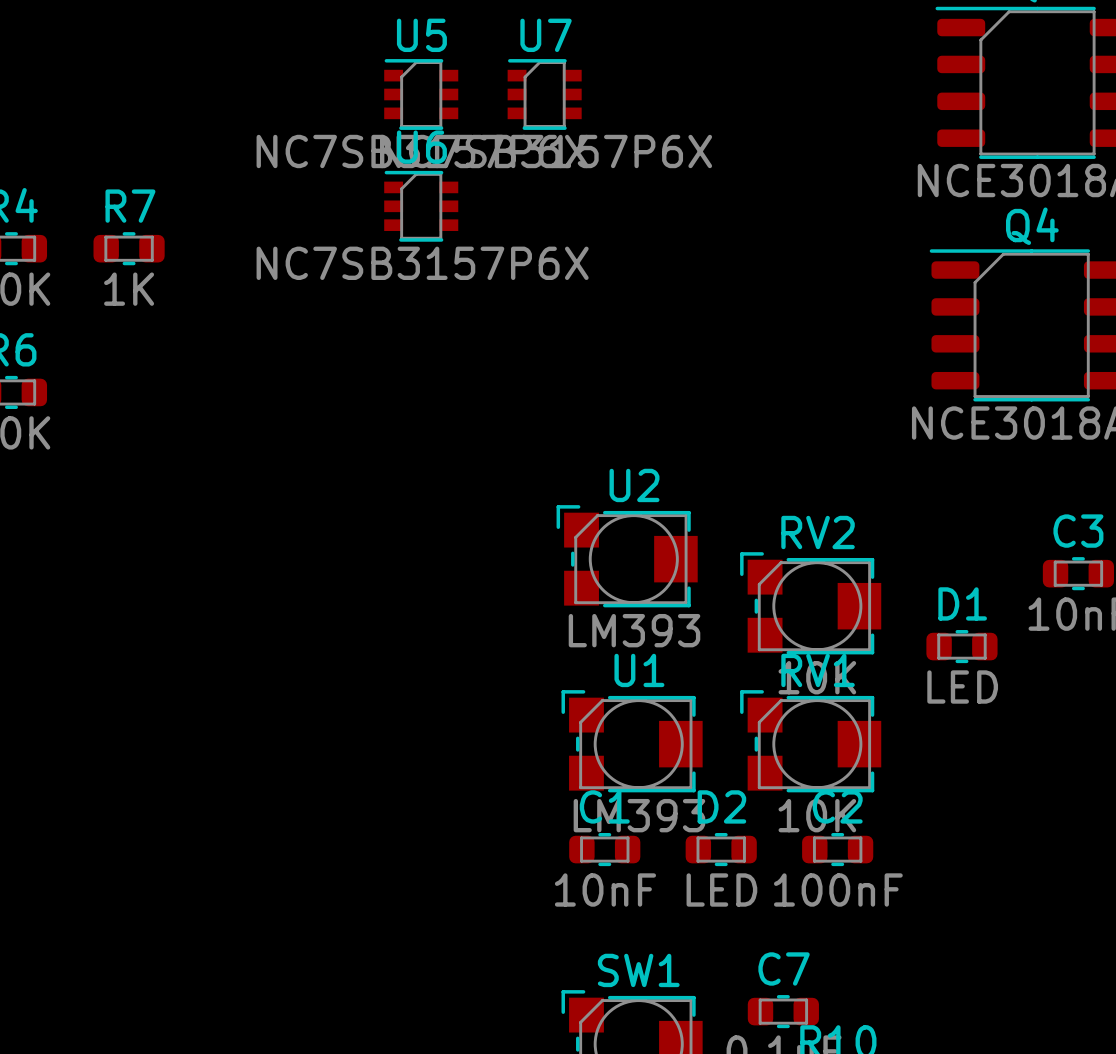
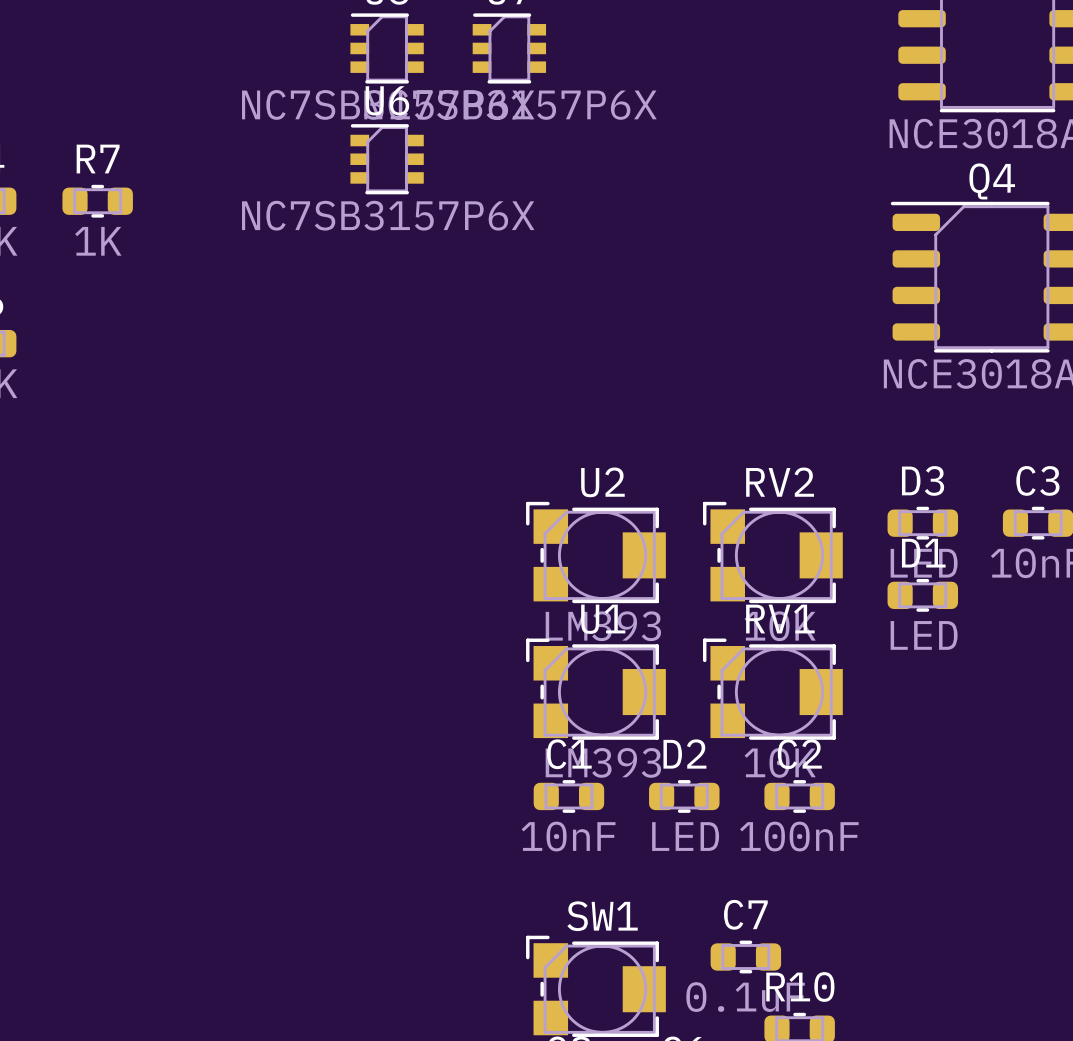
U2 position: (627, 556) -> (595, 552)
D3: none -> LED (922, 523)

